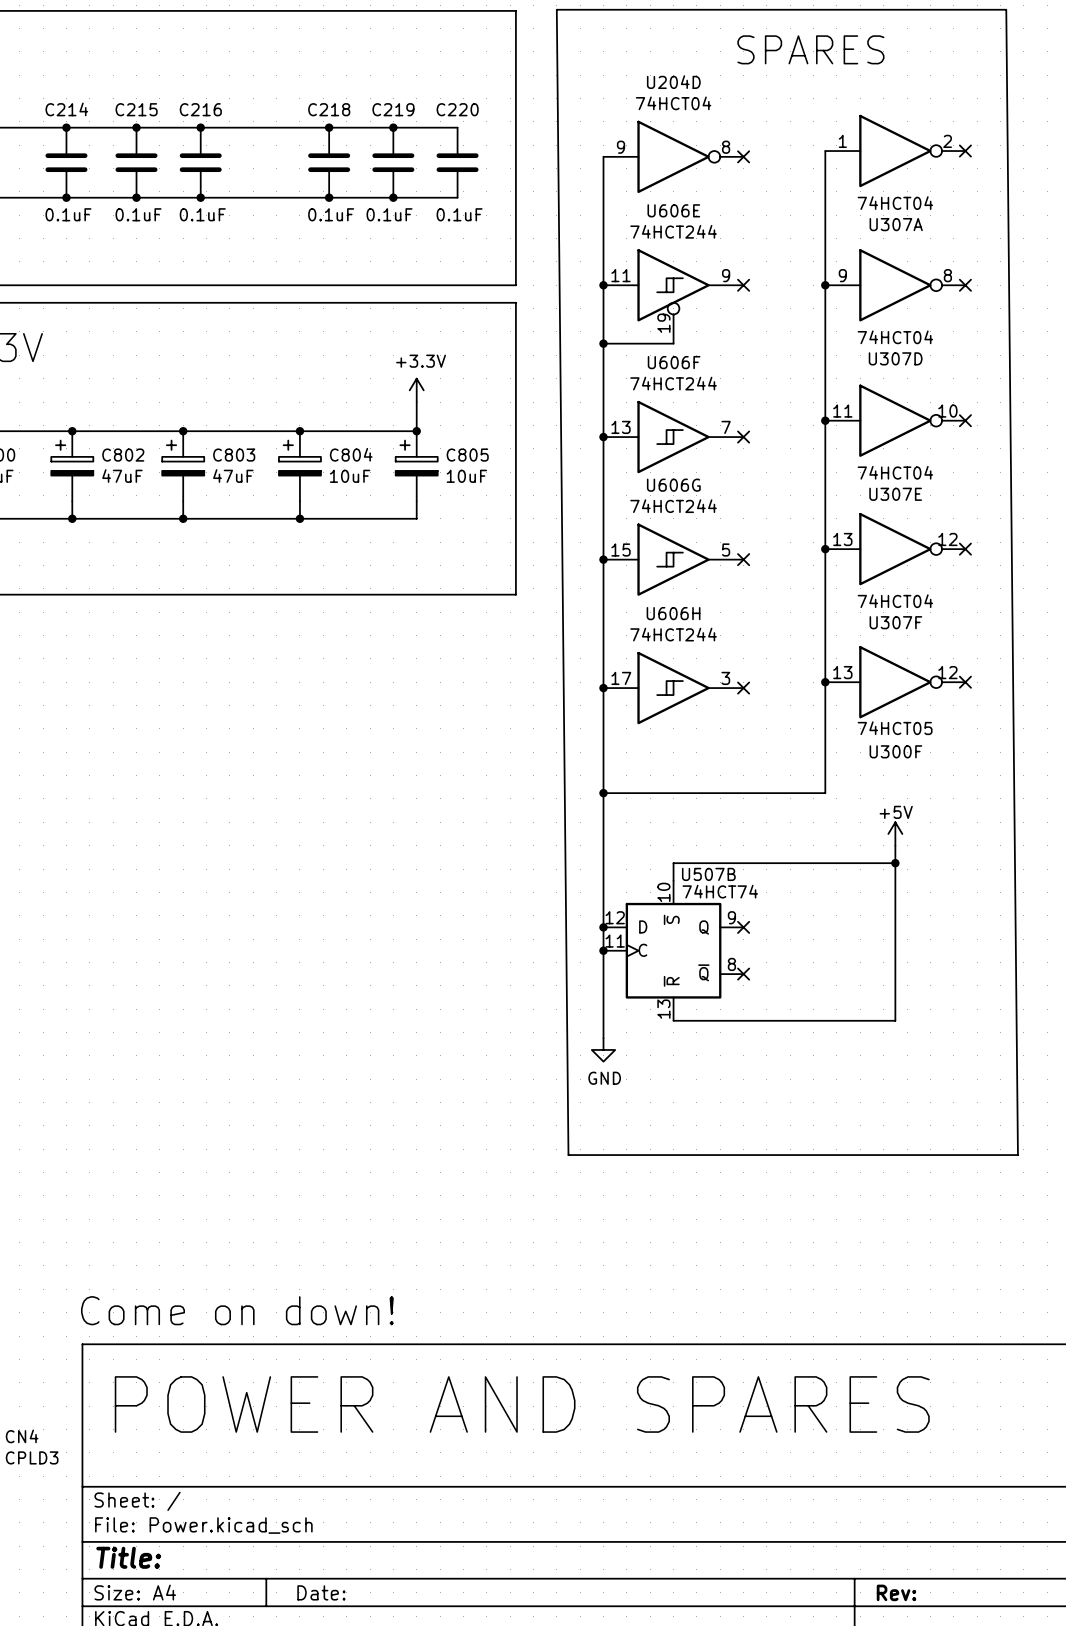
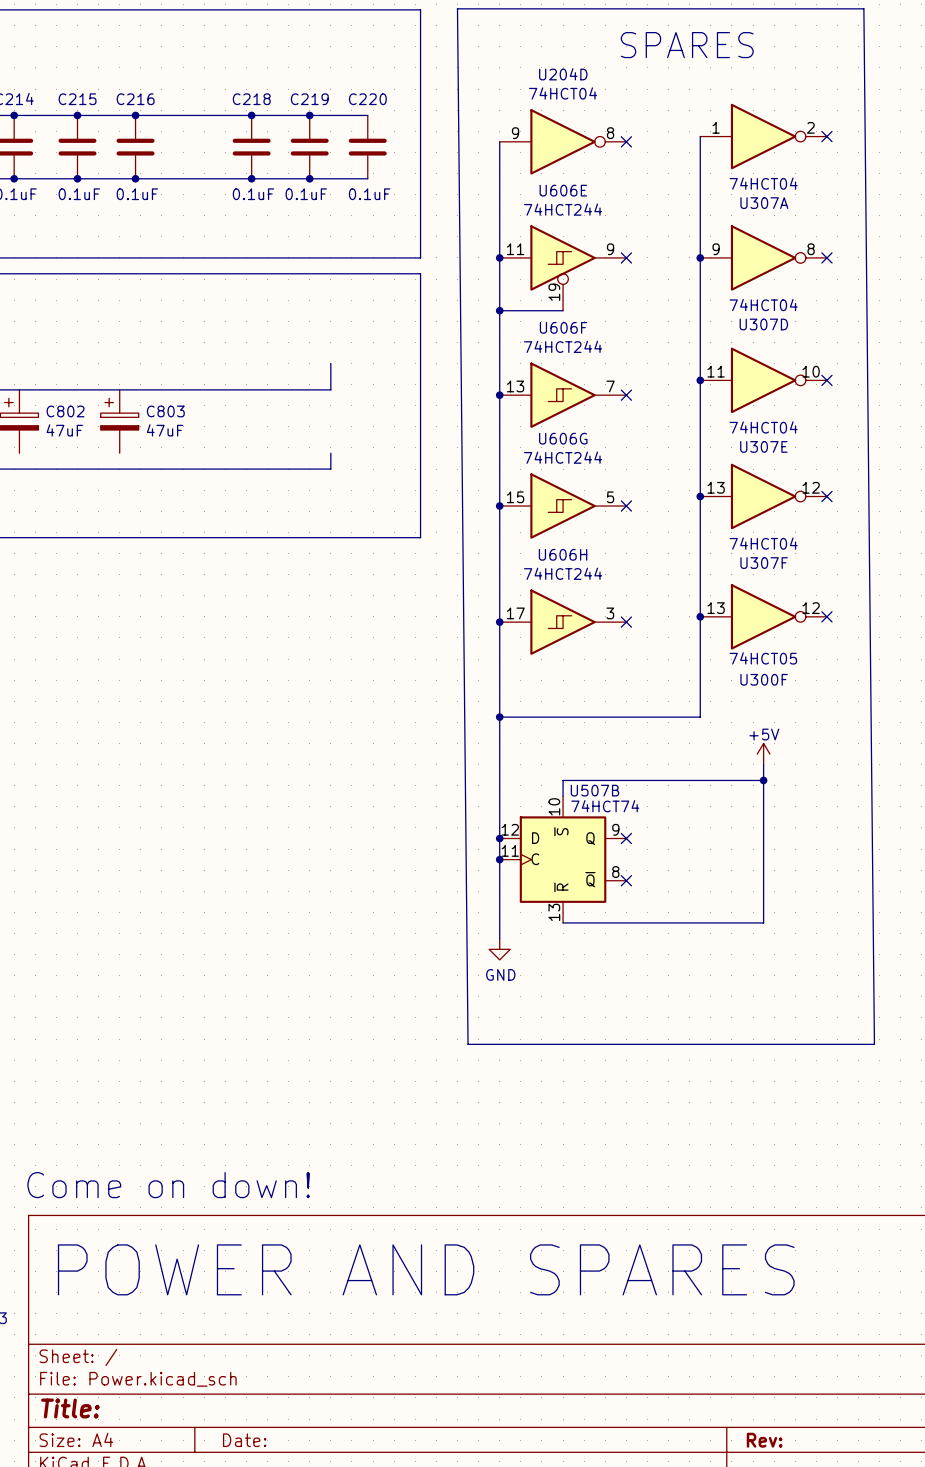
power symbol: +3.3V (416, 390) -> none
junction: (72, 431) -> none
junction: (183, 431) -> none
junction: (299, 431) -> none
junction: (416, 431) -> none
C804: 10uF (299, 466) -> none
C805: 10uF (416, 466) -> none
wire: (72, 501) (72, 518) -> none
wire: (183, 501) (183, 518) -> none
wire: (299, 501) (299, 518) -> none
junction: (72, 518) -> none
junction: (183, 518) -> none
junction: (299, 518) -> none

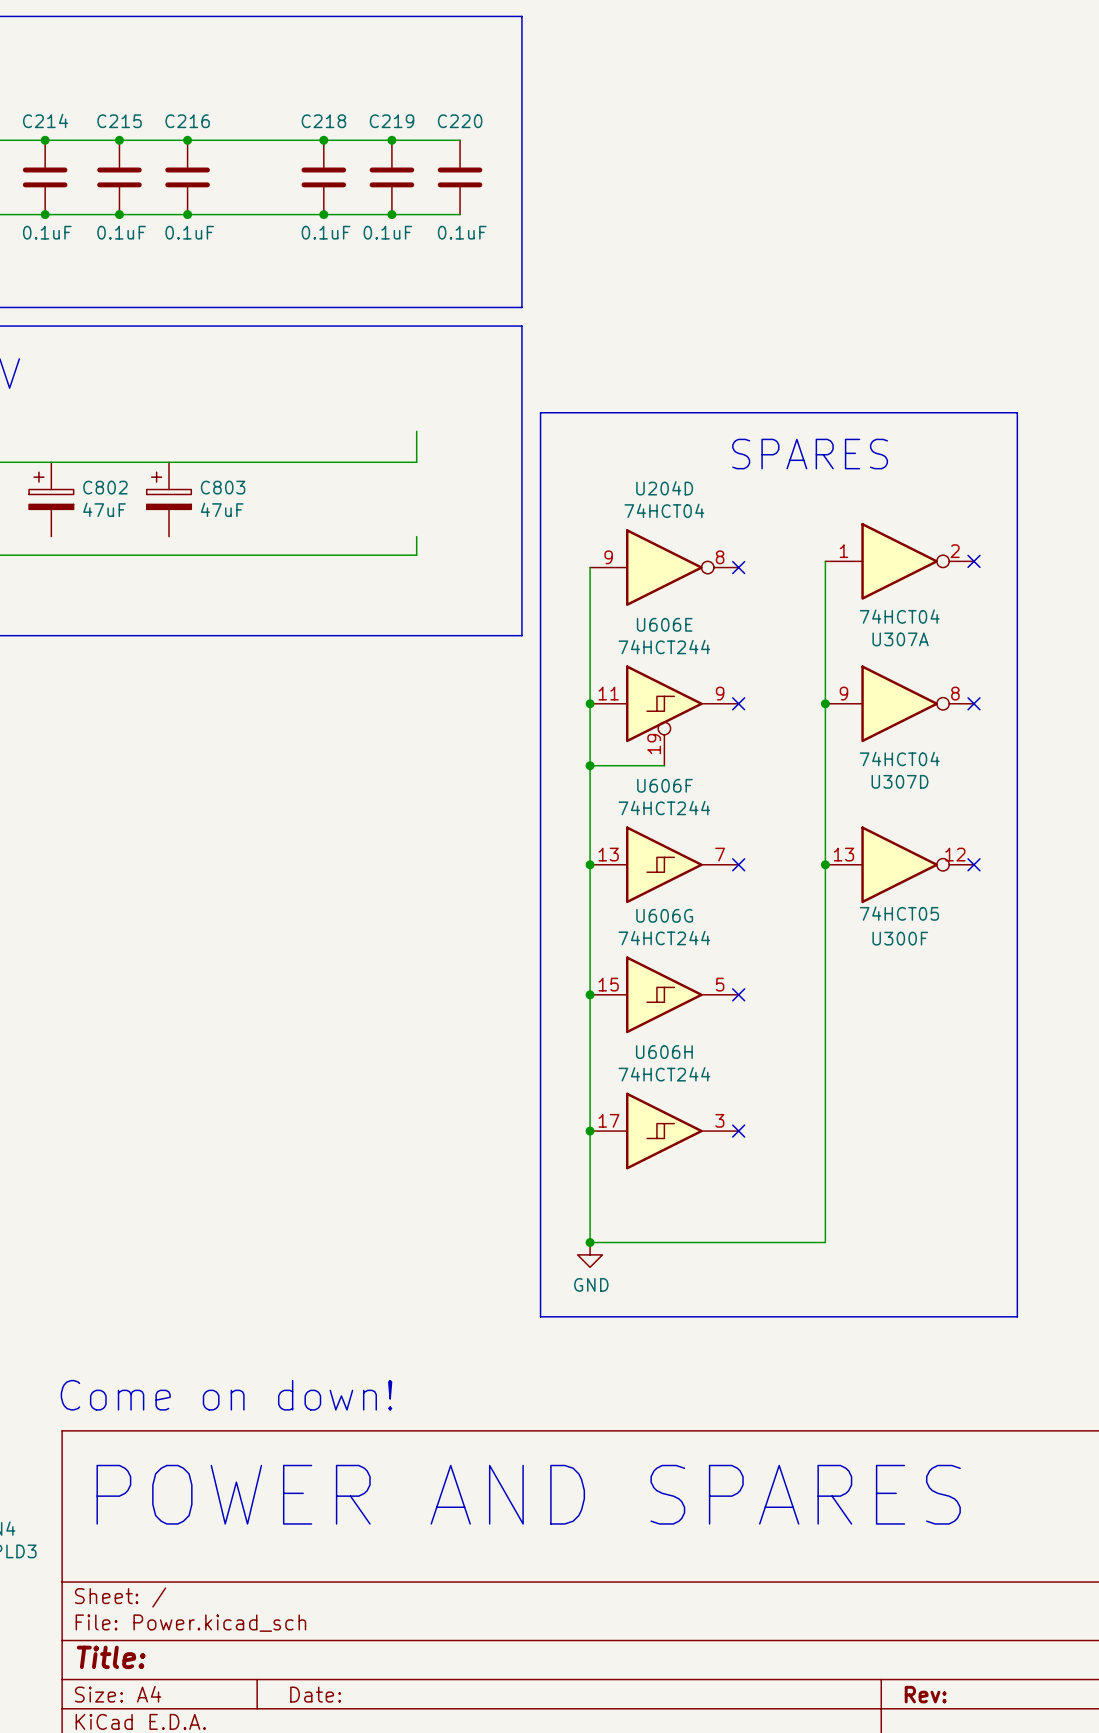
line: (457, 8) (468, 1044) (874, 1044) (863, 8) (457, 8) -> (540, 412) (540, 1316) (1017, 1316) (1017, 412) (540, 412)
text: SPARES (687, 45) -> none
wire: (700, 136) (700, 717) (499, 717) -> none
U307A position: (763, 136) -> (899, 561)
no-connect mark: (826, 136) -> none
wire: (499, 141) (499, 938) -> none
U204D position: (563, 141) -> (664, 567)
no-connect mark: (626, 141) -> none
junction: (499, 257) -> none
no-connect mark: (626, 257) -> none
junction: (700, 257) -> none
U307D position: (763, 257) -> (899, 703)
no-connect mark: (826, 257) -> none
U606E position: (563, 267) -> (664, 715)
wire: (499, 310) (563, 310) -> none
junction: (499, 310) -> none
junction: (700, 380) -> none
U307E: 74HCT04 (763, 380) -> none
no-connect mark: (826, 380) -> none
text: none -> SPARES (810, 454)
junction: (499, 395) -> none
U606F position: (563, 395) -> (664, 864)
no-connect mark: (626, 395) -> none
wire: none -> (825, 561) (825, 1242) (590, 1242) (590, 567)
junction: (700, 496) -> none
U307F: 74HCT04 (763, 496) -> none
no-connect mark position: (826, 496) -> (974, 561)
junction: (499, 506) -> none
U606G position: (563, 506) -> (664, 994)
no-connect mark position: (626, 506) -> (738, 567)
junction: none -> (590, 703)
junction position: (700, 616) -> (825, 703)
U300F position: (763, 616) -> (899, 864)
no-connect mark position: (826, 616) -> (974, 703)
junction: (499, 622) -> none
U606H position: (563, 622) -> (664, 1131)
no-connect mark position: (626, 622) -> (738, 703)
wire: none -> (590, 765) (664, 765)
junction: none -> (590, 765)
junction position: (499, 717) -> (590, 864)
no-connect mark: none -> (738, 864)
junction: none -> (825, 864)
no-connect mark: none -> (974, 864)
power symbol: +5V (763, 754) -> none
wire: (763, 764) (763, 922) (563, 922) -> none
wire: (763, 780) (563, 780) (563, 796) -> none
junction: (763, 780) -> none
junction: (499, 838) -> none
no-connect mark: (626, 838) -> none
junction: none -> (590, 994)
no-connect mark: none -> (738, 994)
junction: (499, 859) -> none
U507B: 74HCT74 (563, 859) -> none
no-connect mark: (626, 880) -> none
power symbol position: GND (499, 949) -> GND (590, 1254)
junction: none -> (590, 1131)
no-connect mark: none -> (738, 1131)
junction: none -> (590, 1242)

